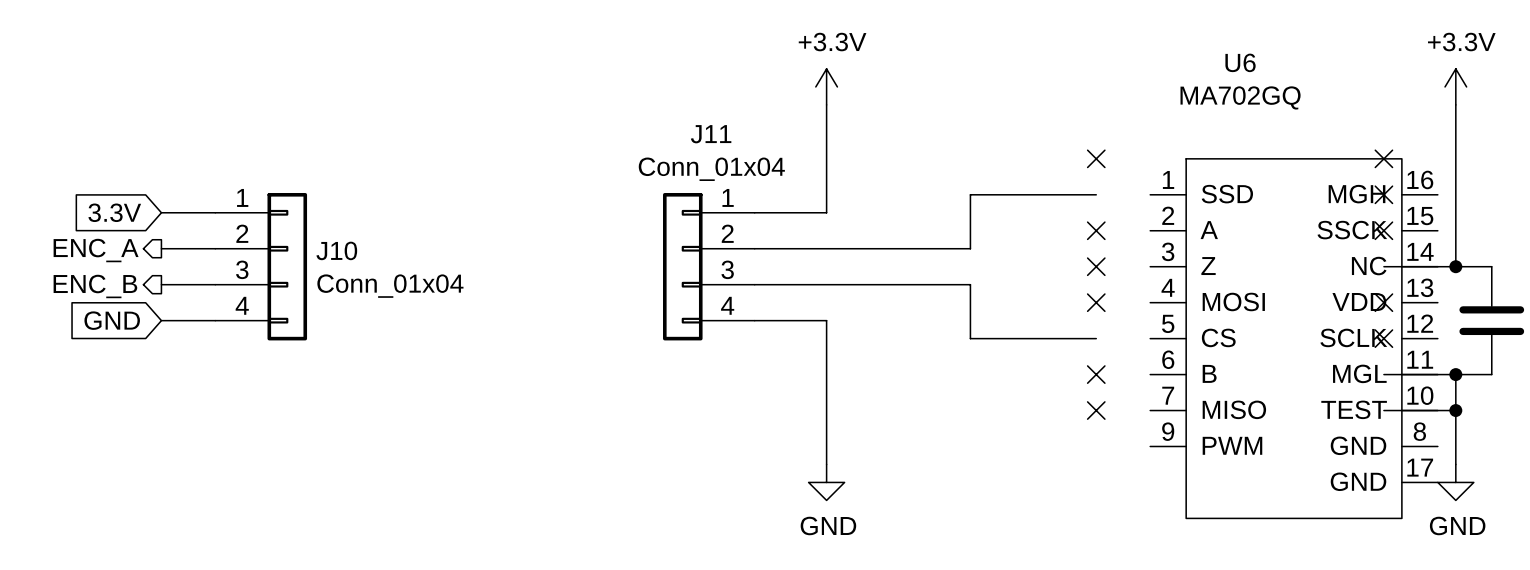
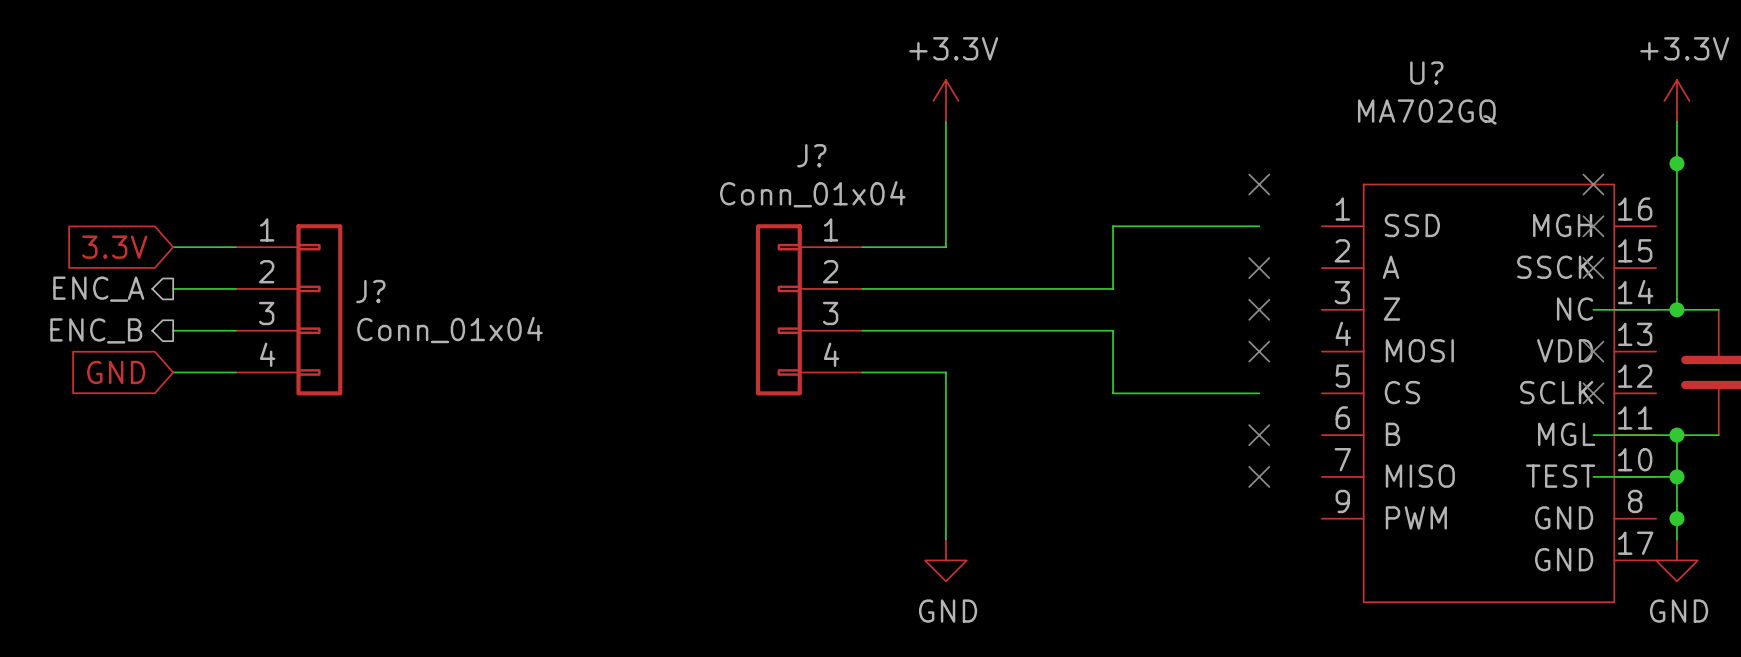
U6 name: U6 (1240, 62) -> U? (1426, 73)
J11 name: J11 (711, 134) -> J? (811, 155)
junction: none -> (1676, 163)
J10 name: J10 (336, 250) -> J? (370, 291)
junction: none -> (1676, 518)

